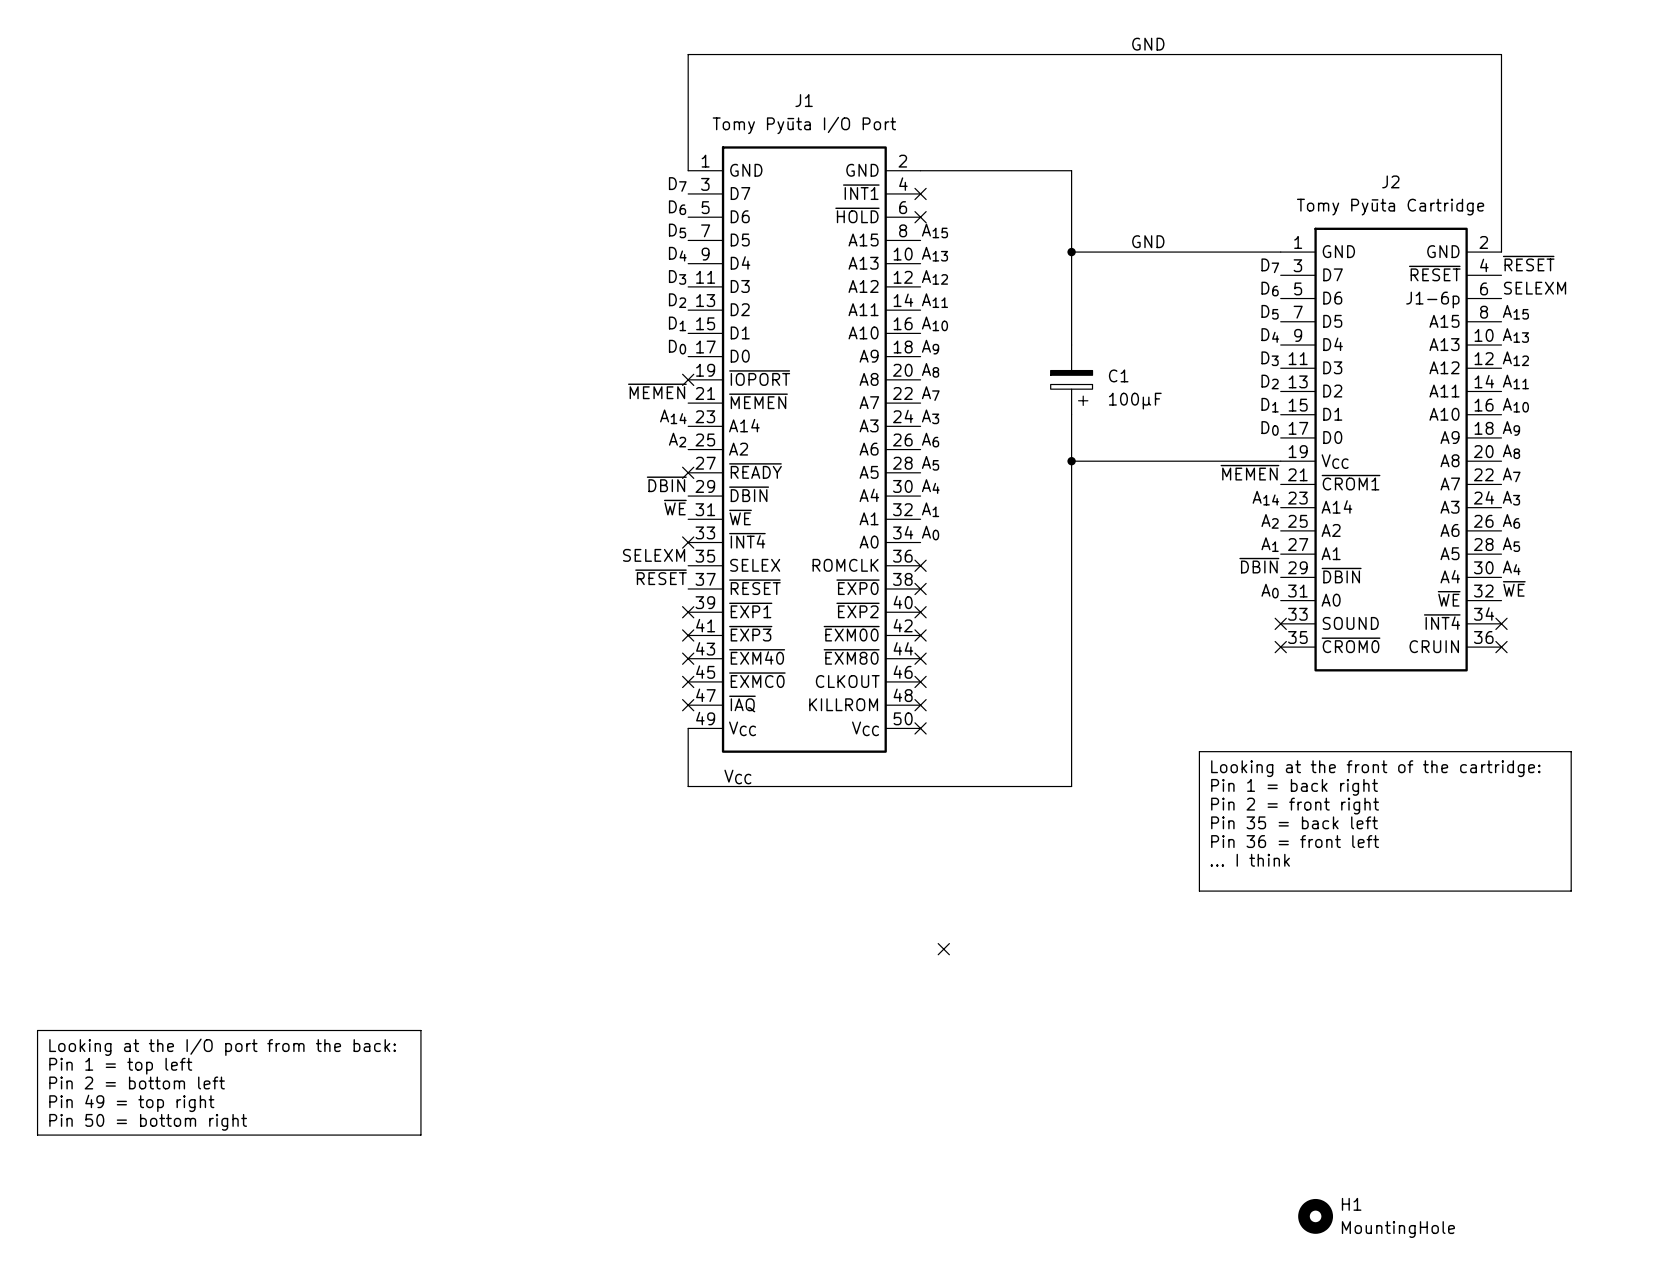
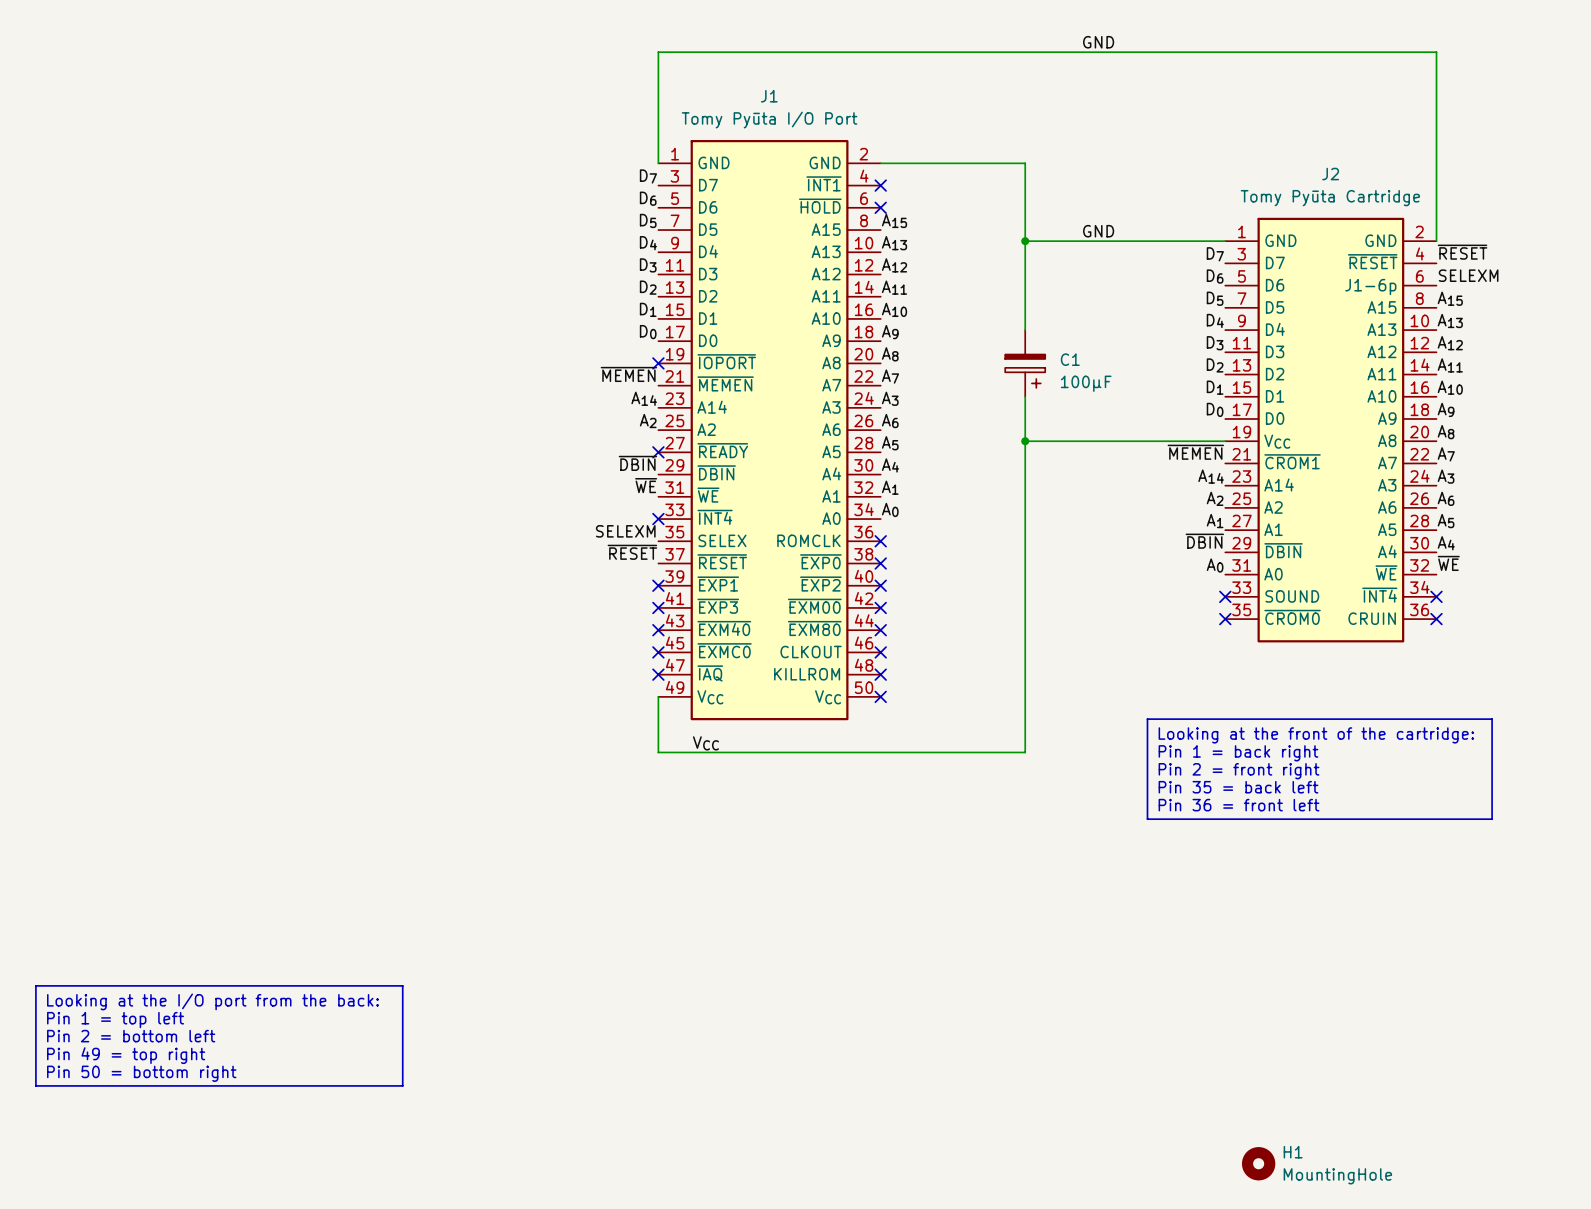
line: (1559, 751) (1571, 751) (1571, 891) (1199, 891) (1199, 856) -> (1492, 719) (1492, 819) (1147, 819)
text: ... I think (1250, 860) -> none
no-connect mark: (943, 949) -> none

